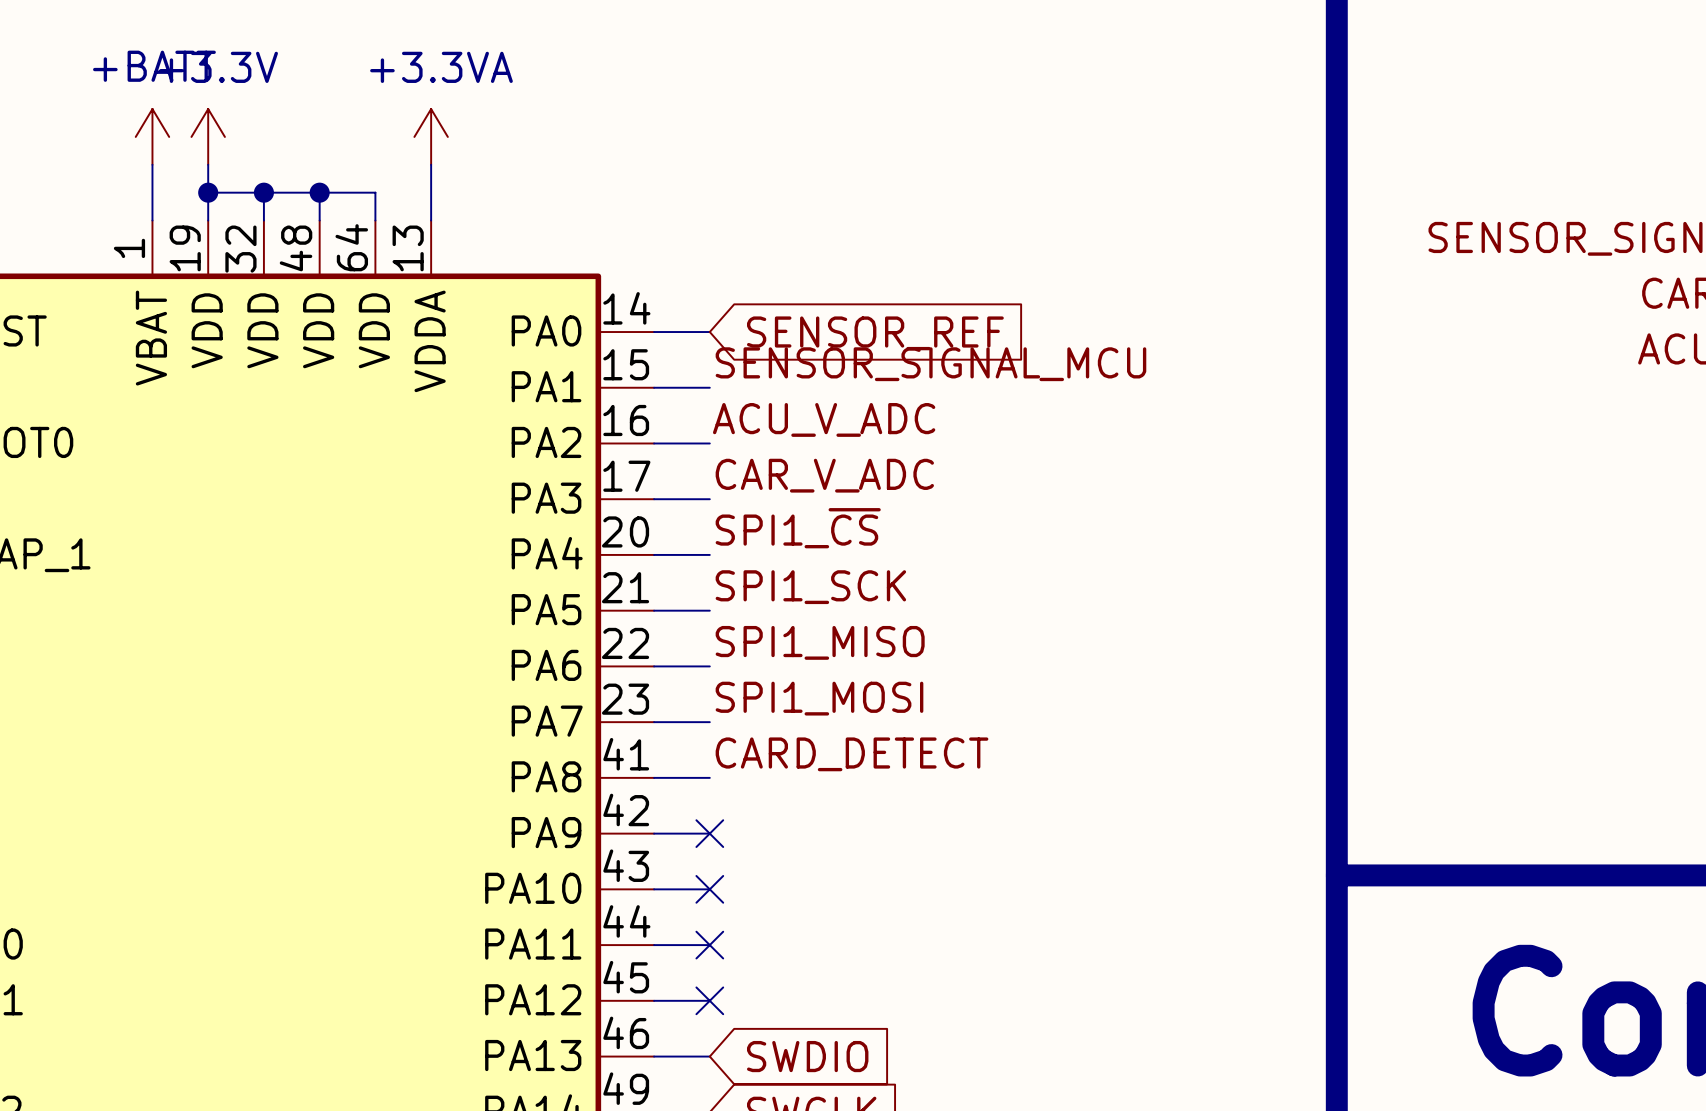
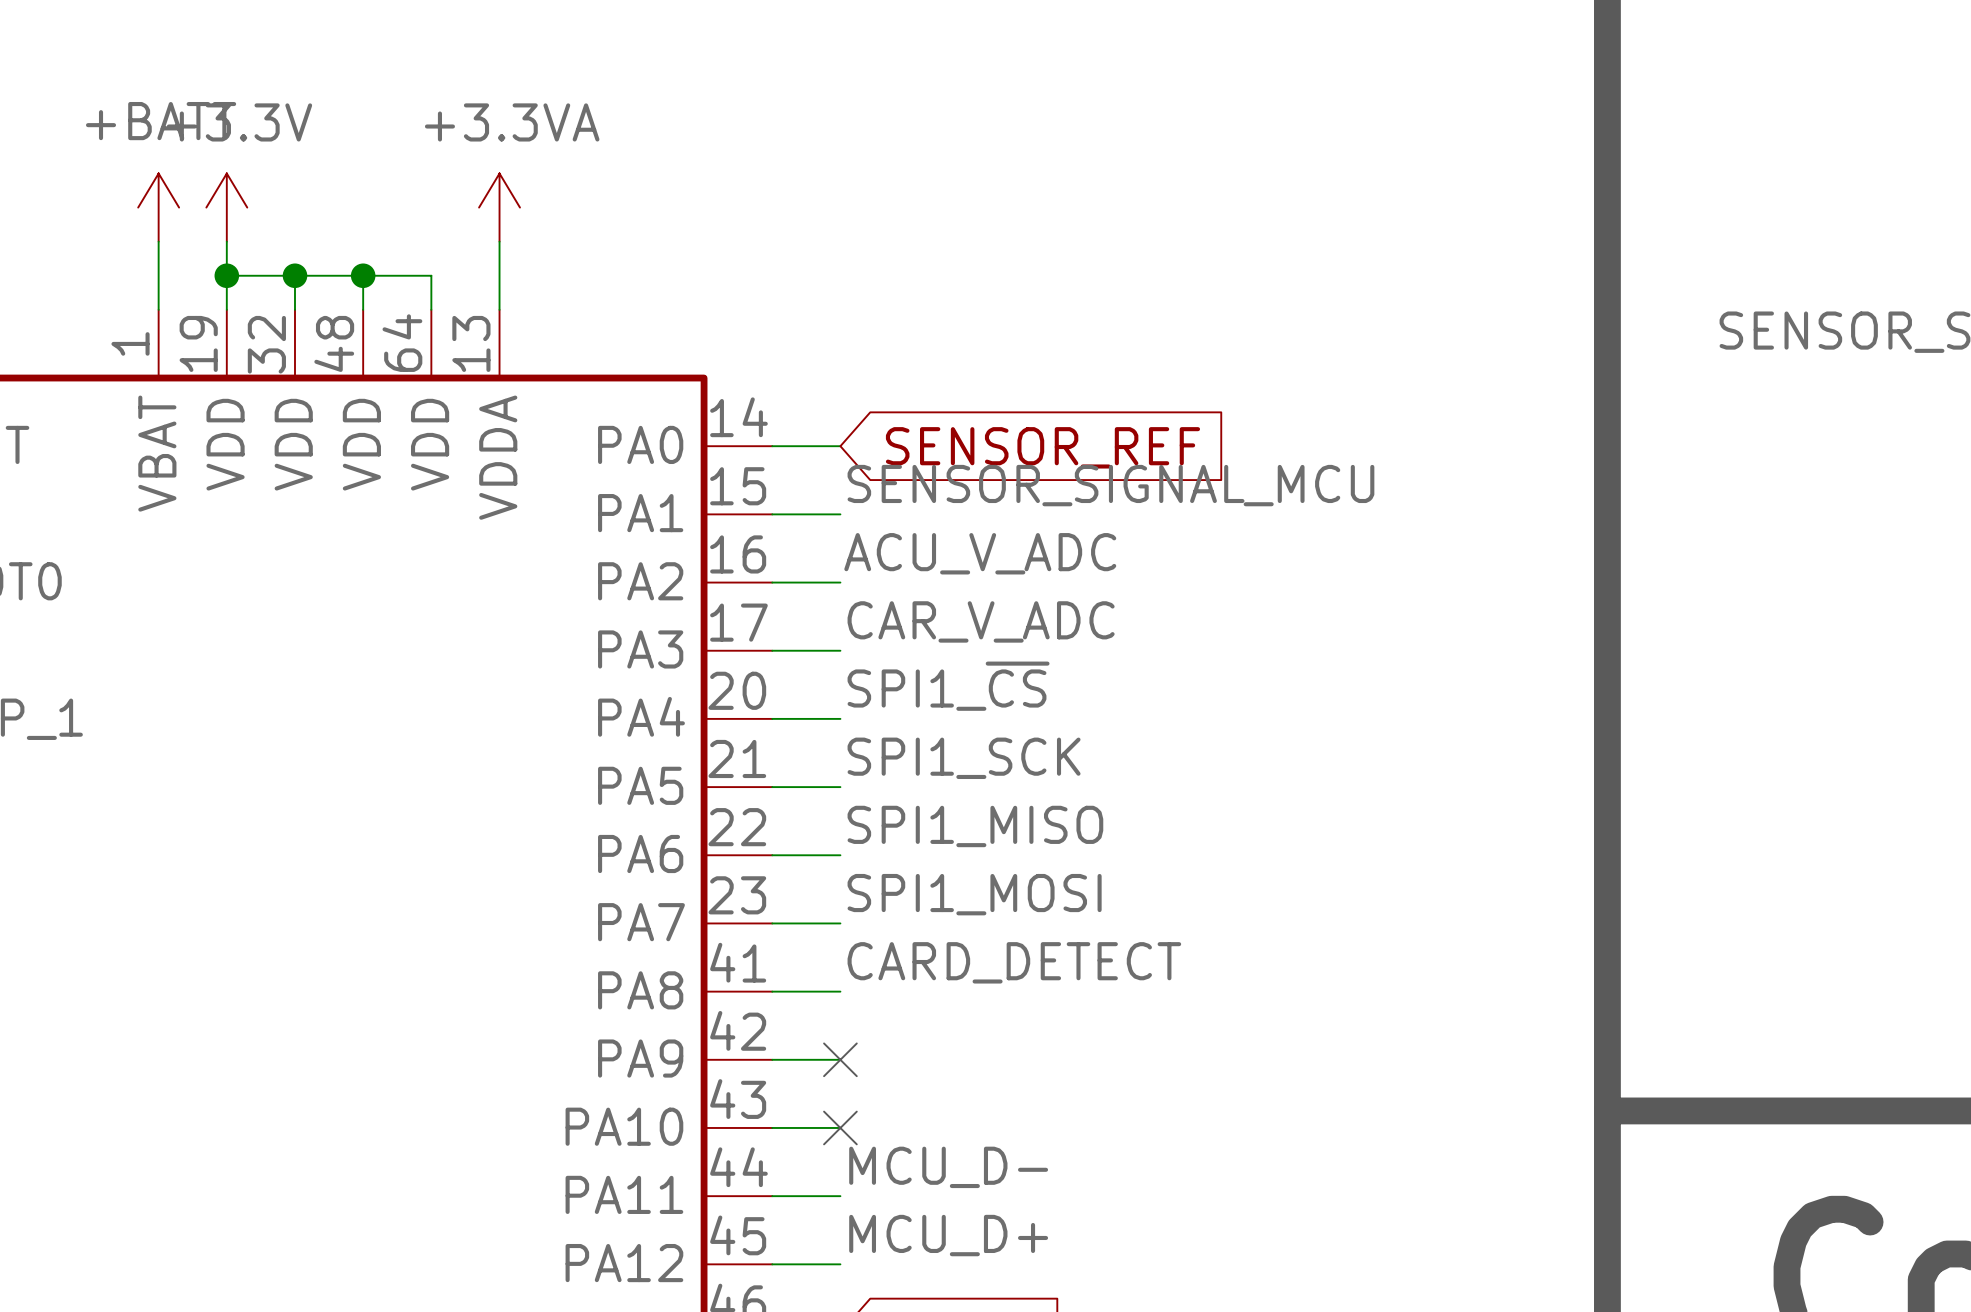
label: none -> MCU_D- (948, 1167)
no-connect mark: (709, 945) -> none
label: none -> MCU_D+ (948, 1235)
no-connect mark: (709, 1000) -> none

